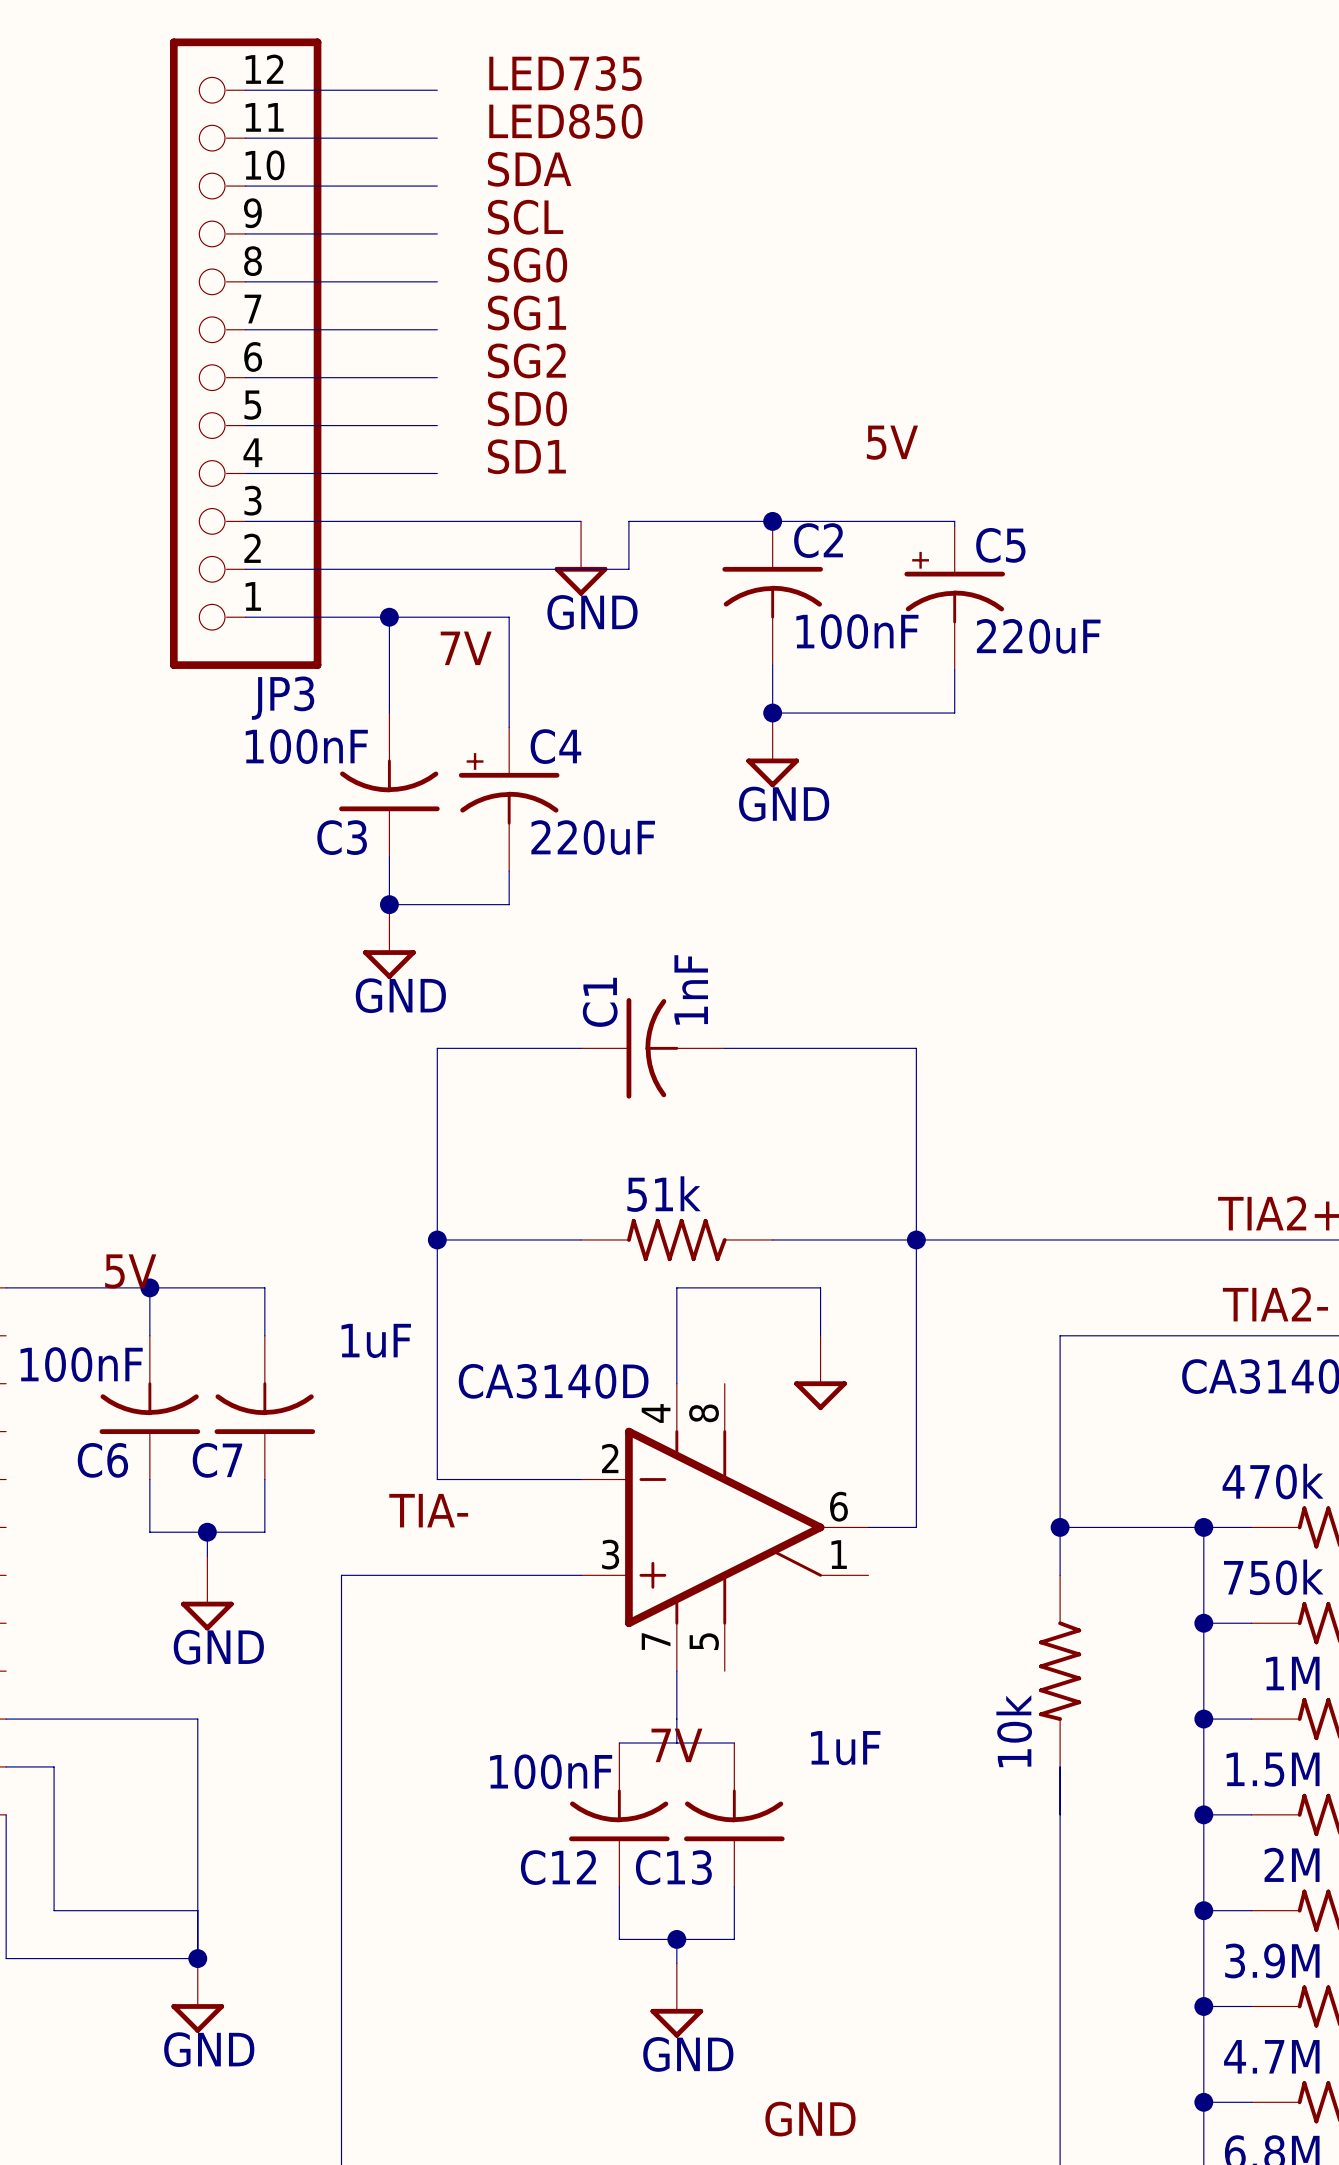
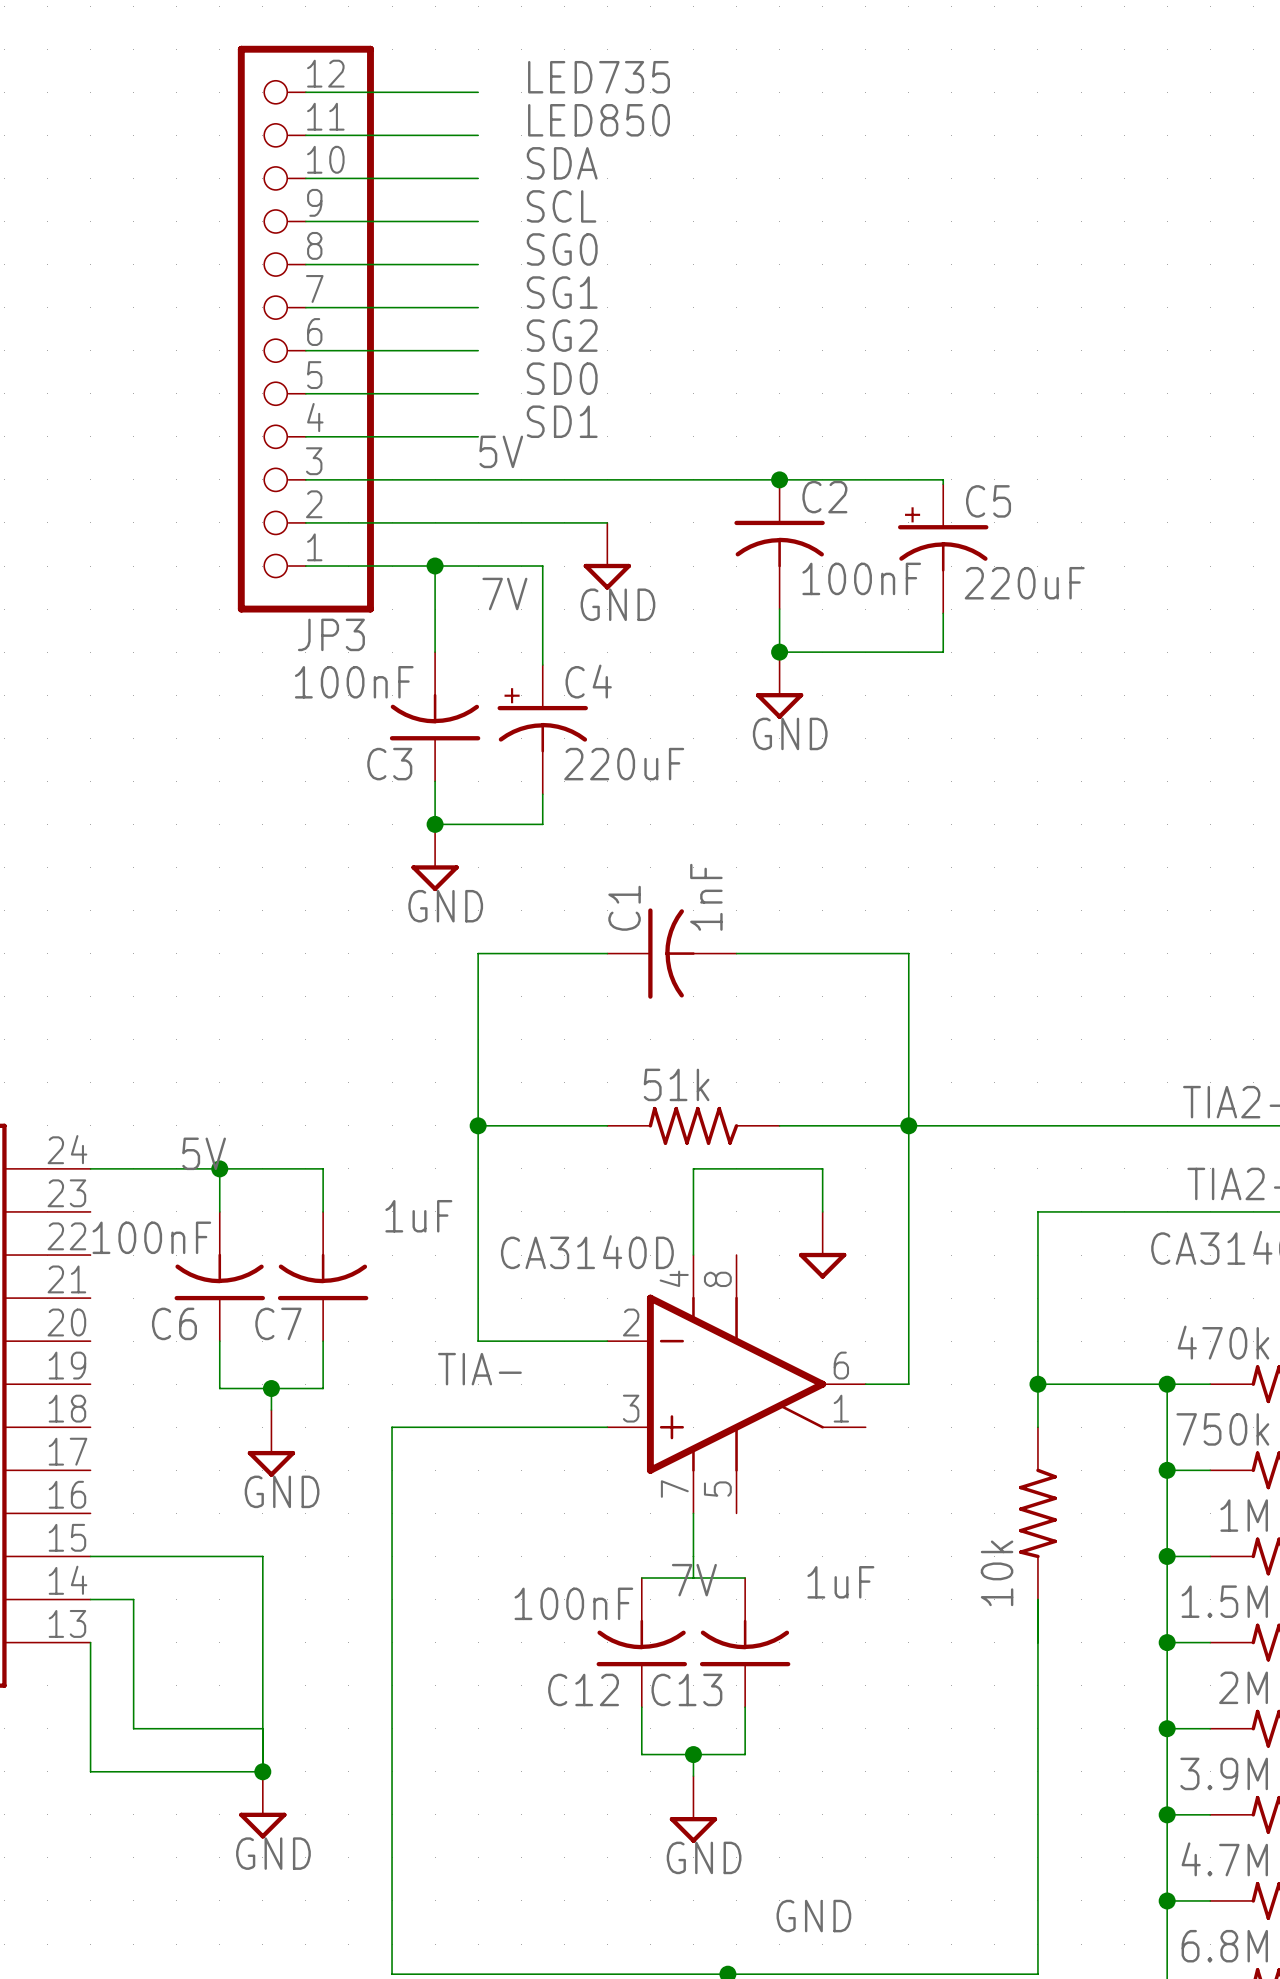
label position: 5V (892, 442) -> 5V (501, 451)
wire: (628, 521) (628, 569) (581, 569) -> (650, 479) (607, 479)
power symbol position: GND (581, 558) -> GND (607, 556)

